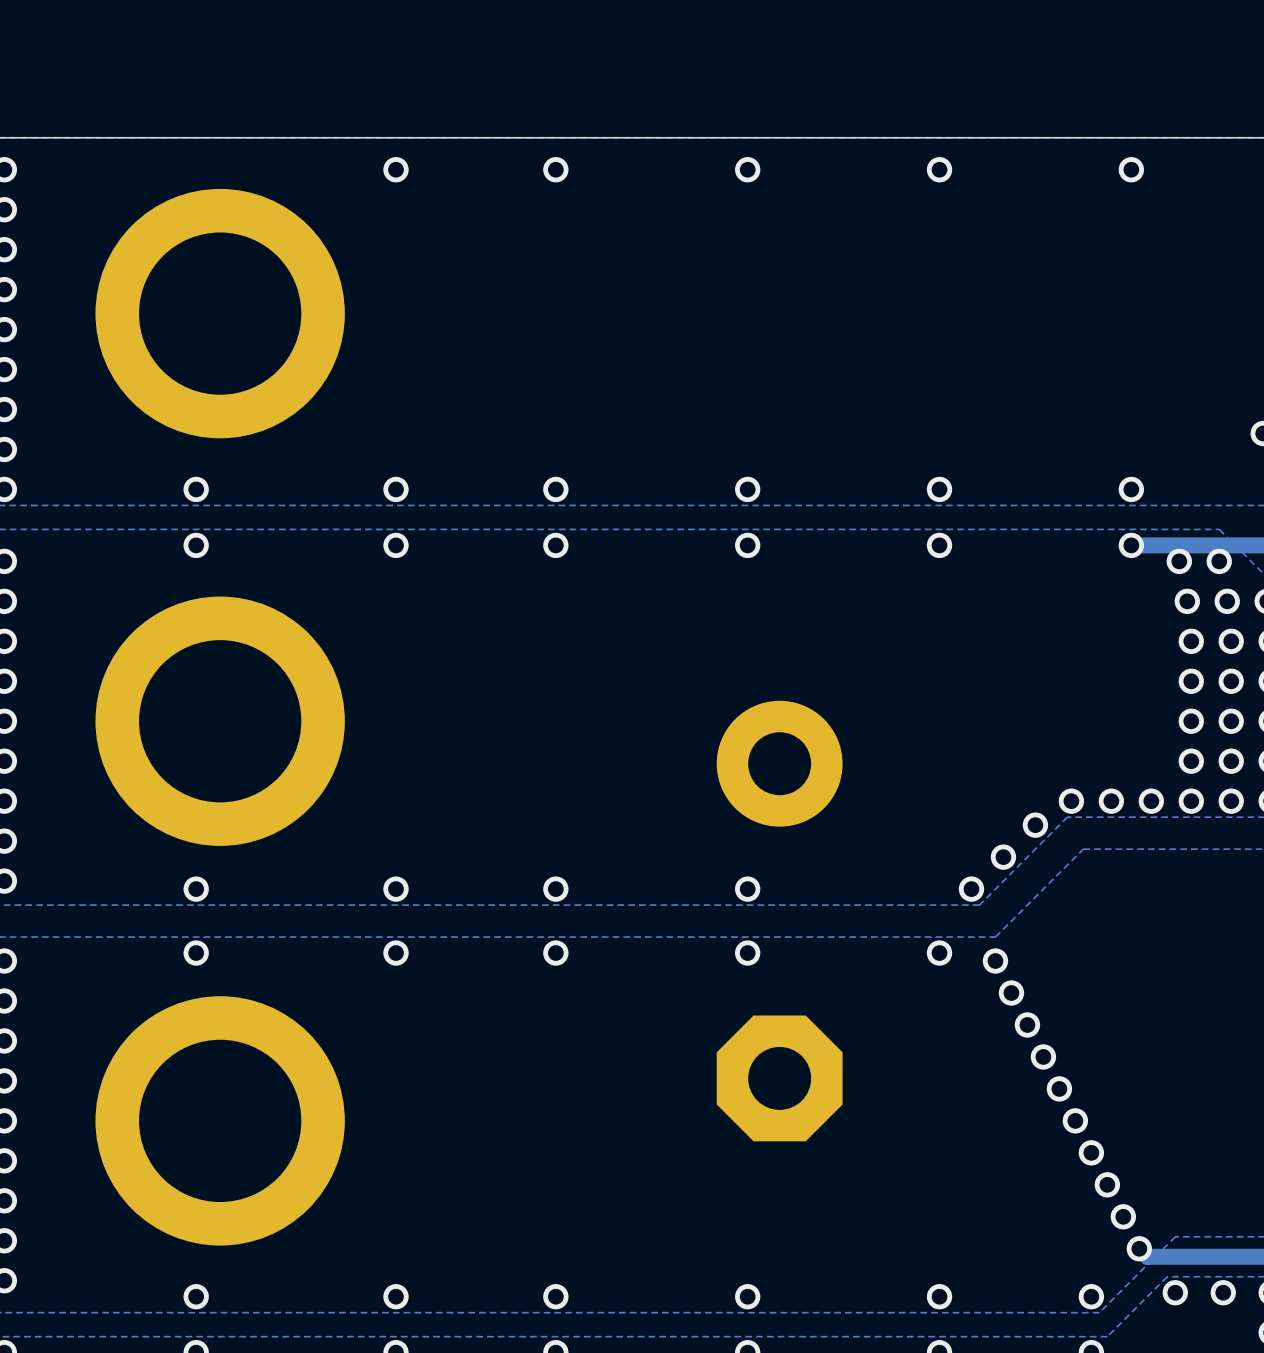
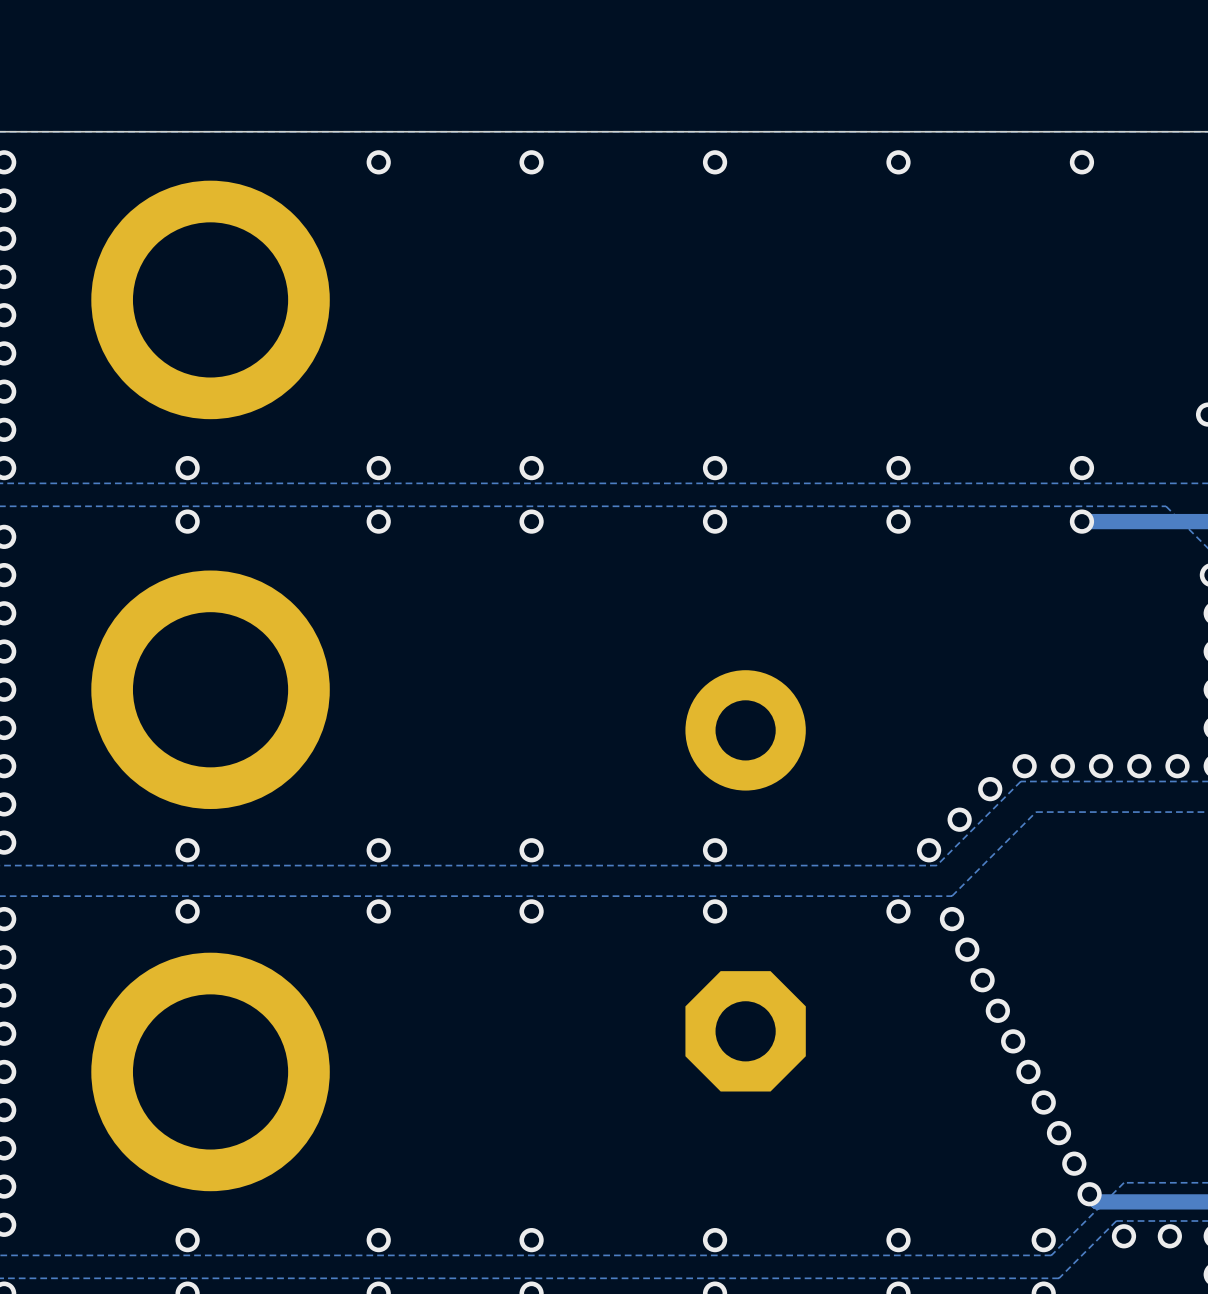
via: (1179, 561) -> none
via: (1219, 561) -> none
via: (1187, 601) -> none
via: (1227, 601) -> none
via: (1191, 641) -> none
via: (1231, 641) -> none
via: (1191, 681) -> none
via: (1231, 681) -> none
via: (1191, 721) -> none
via: (1231, 721) -> none
via: (1191, 761) -> none
via: (1231, 761) -> none

